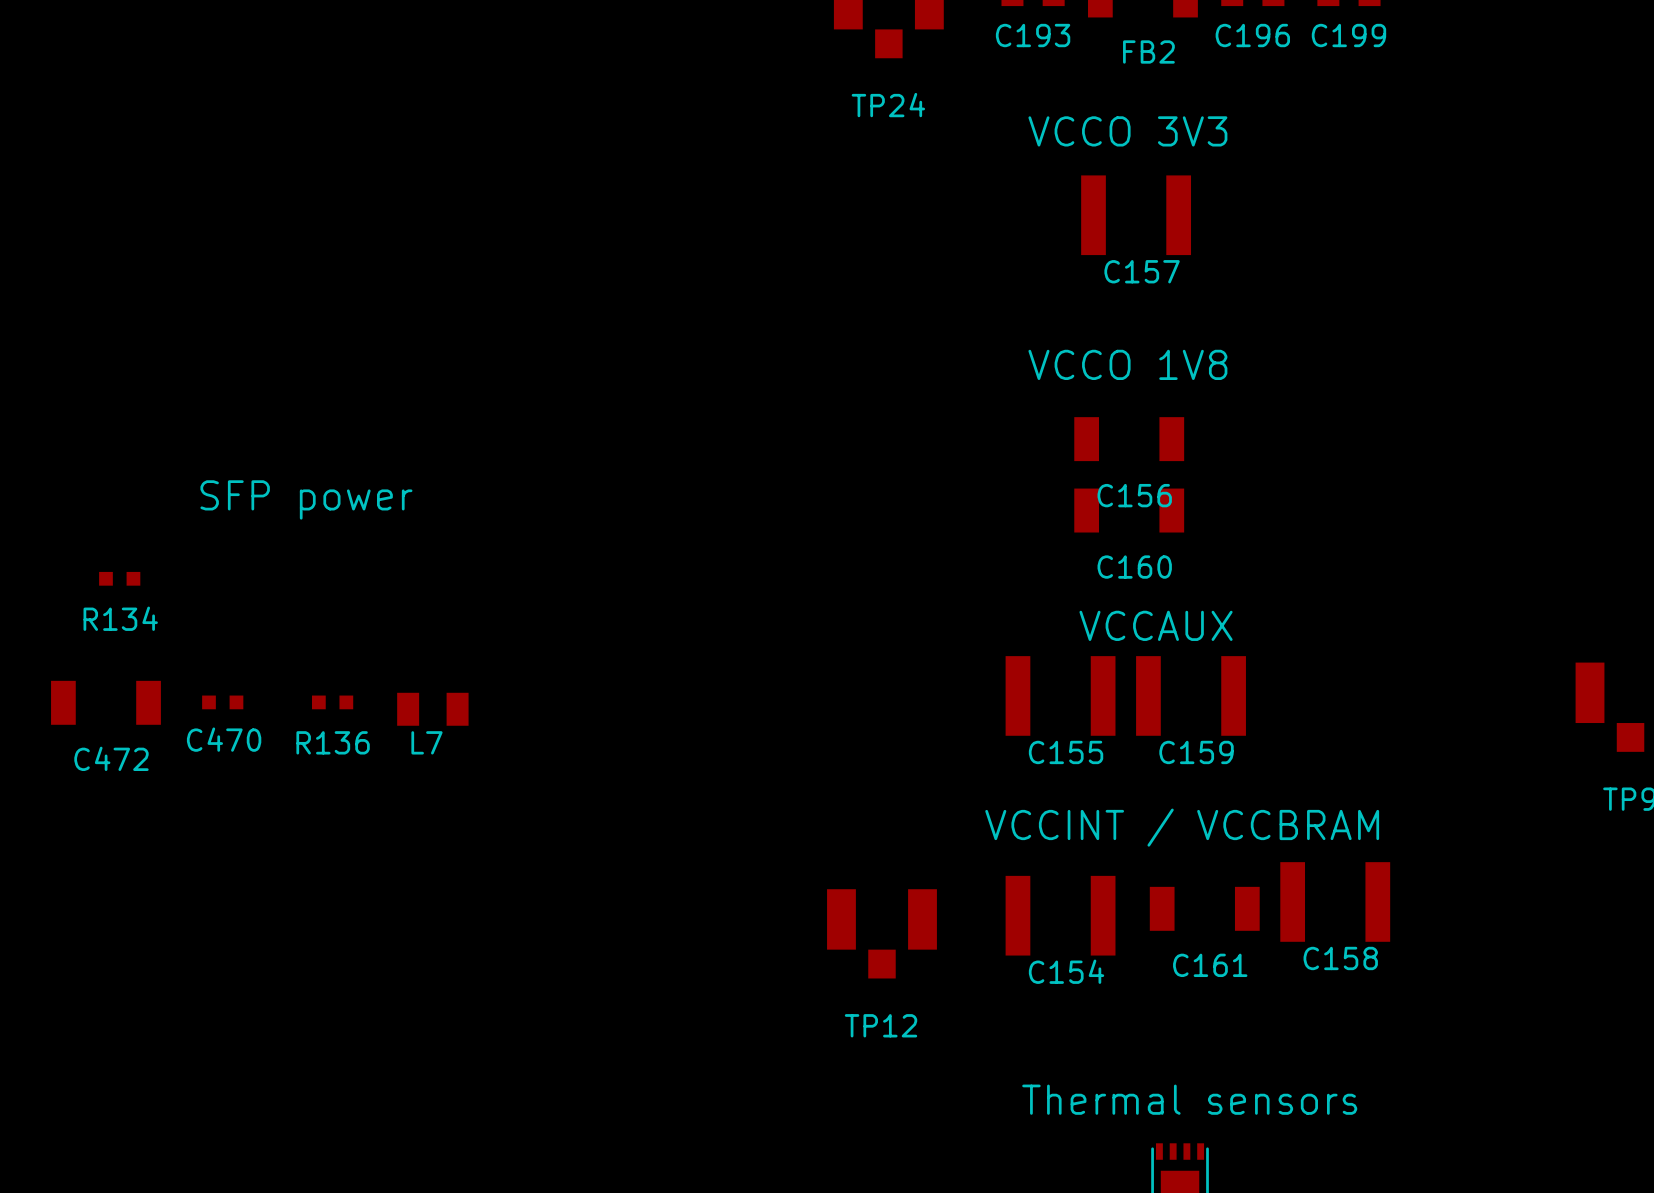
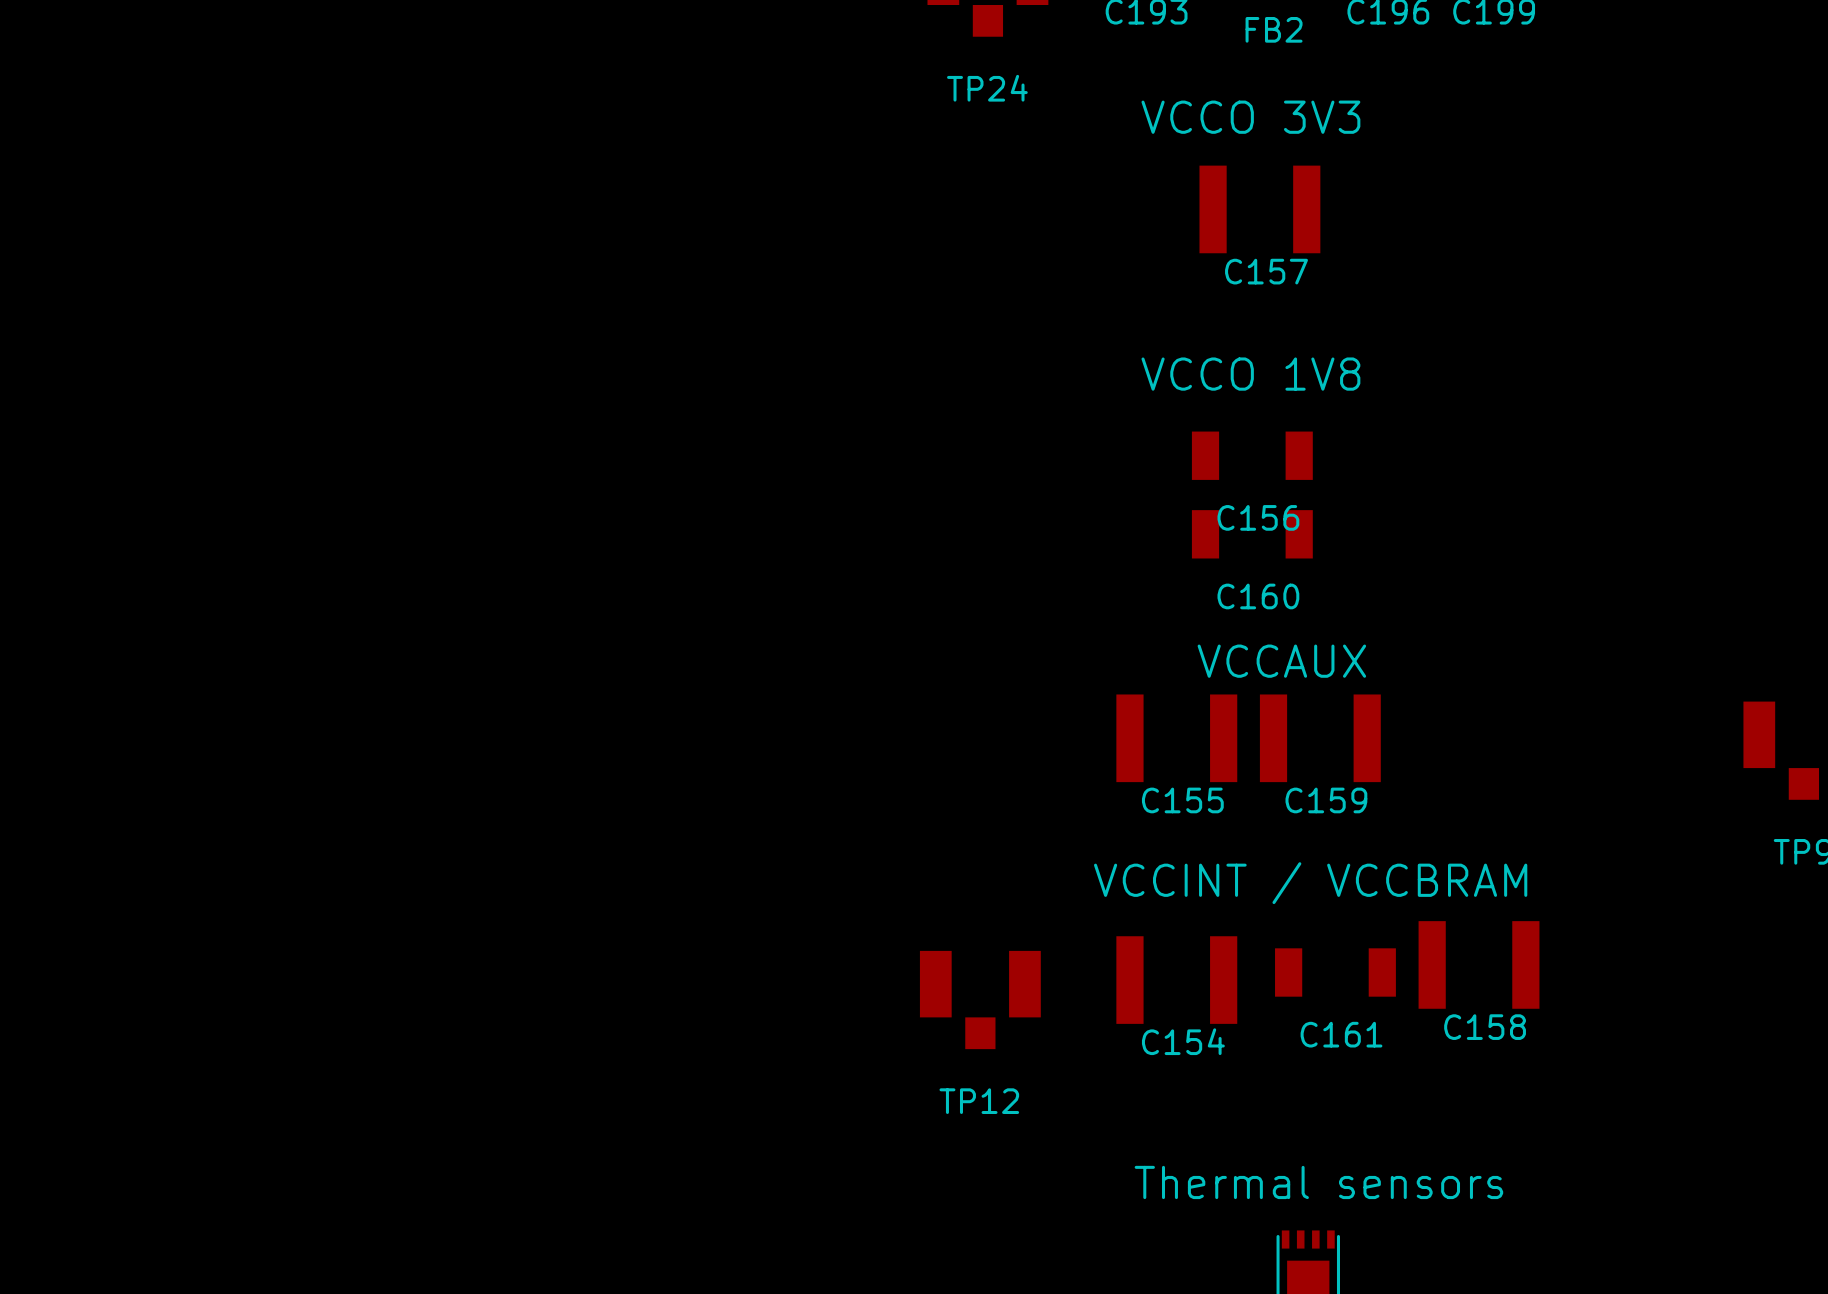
text: SFP power (306, 499) -> none
R134: (119, 578) -> none
C472: (105, 702) -> none
C470: (222, 702) -> none
R136: (332, 702) -> none
L7: (432, 709) -> none

